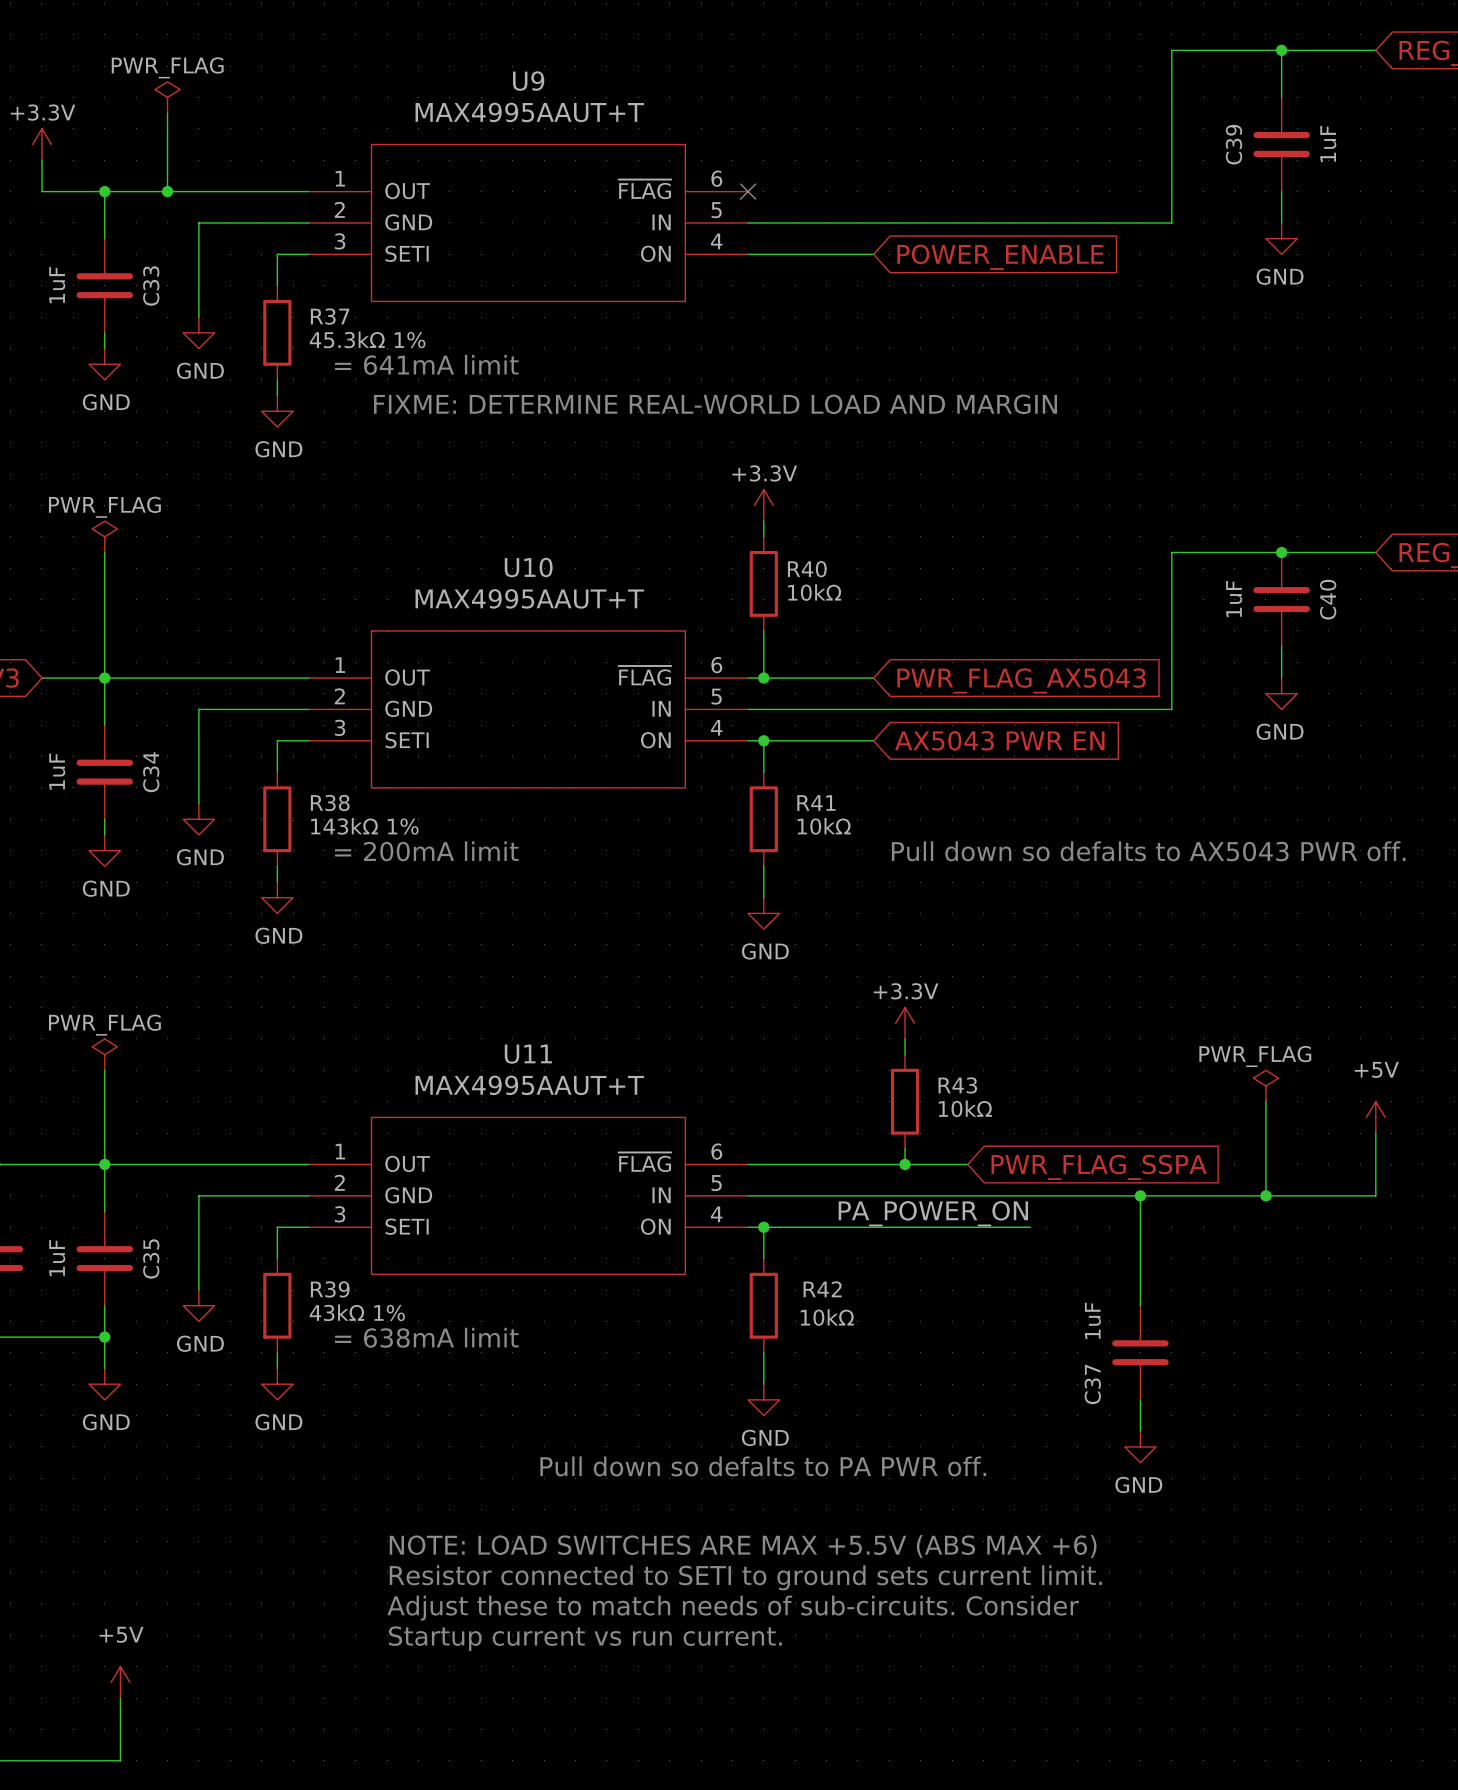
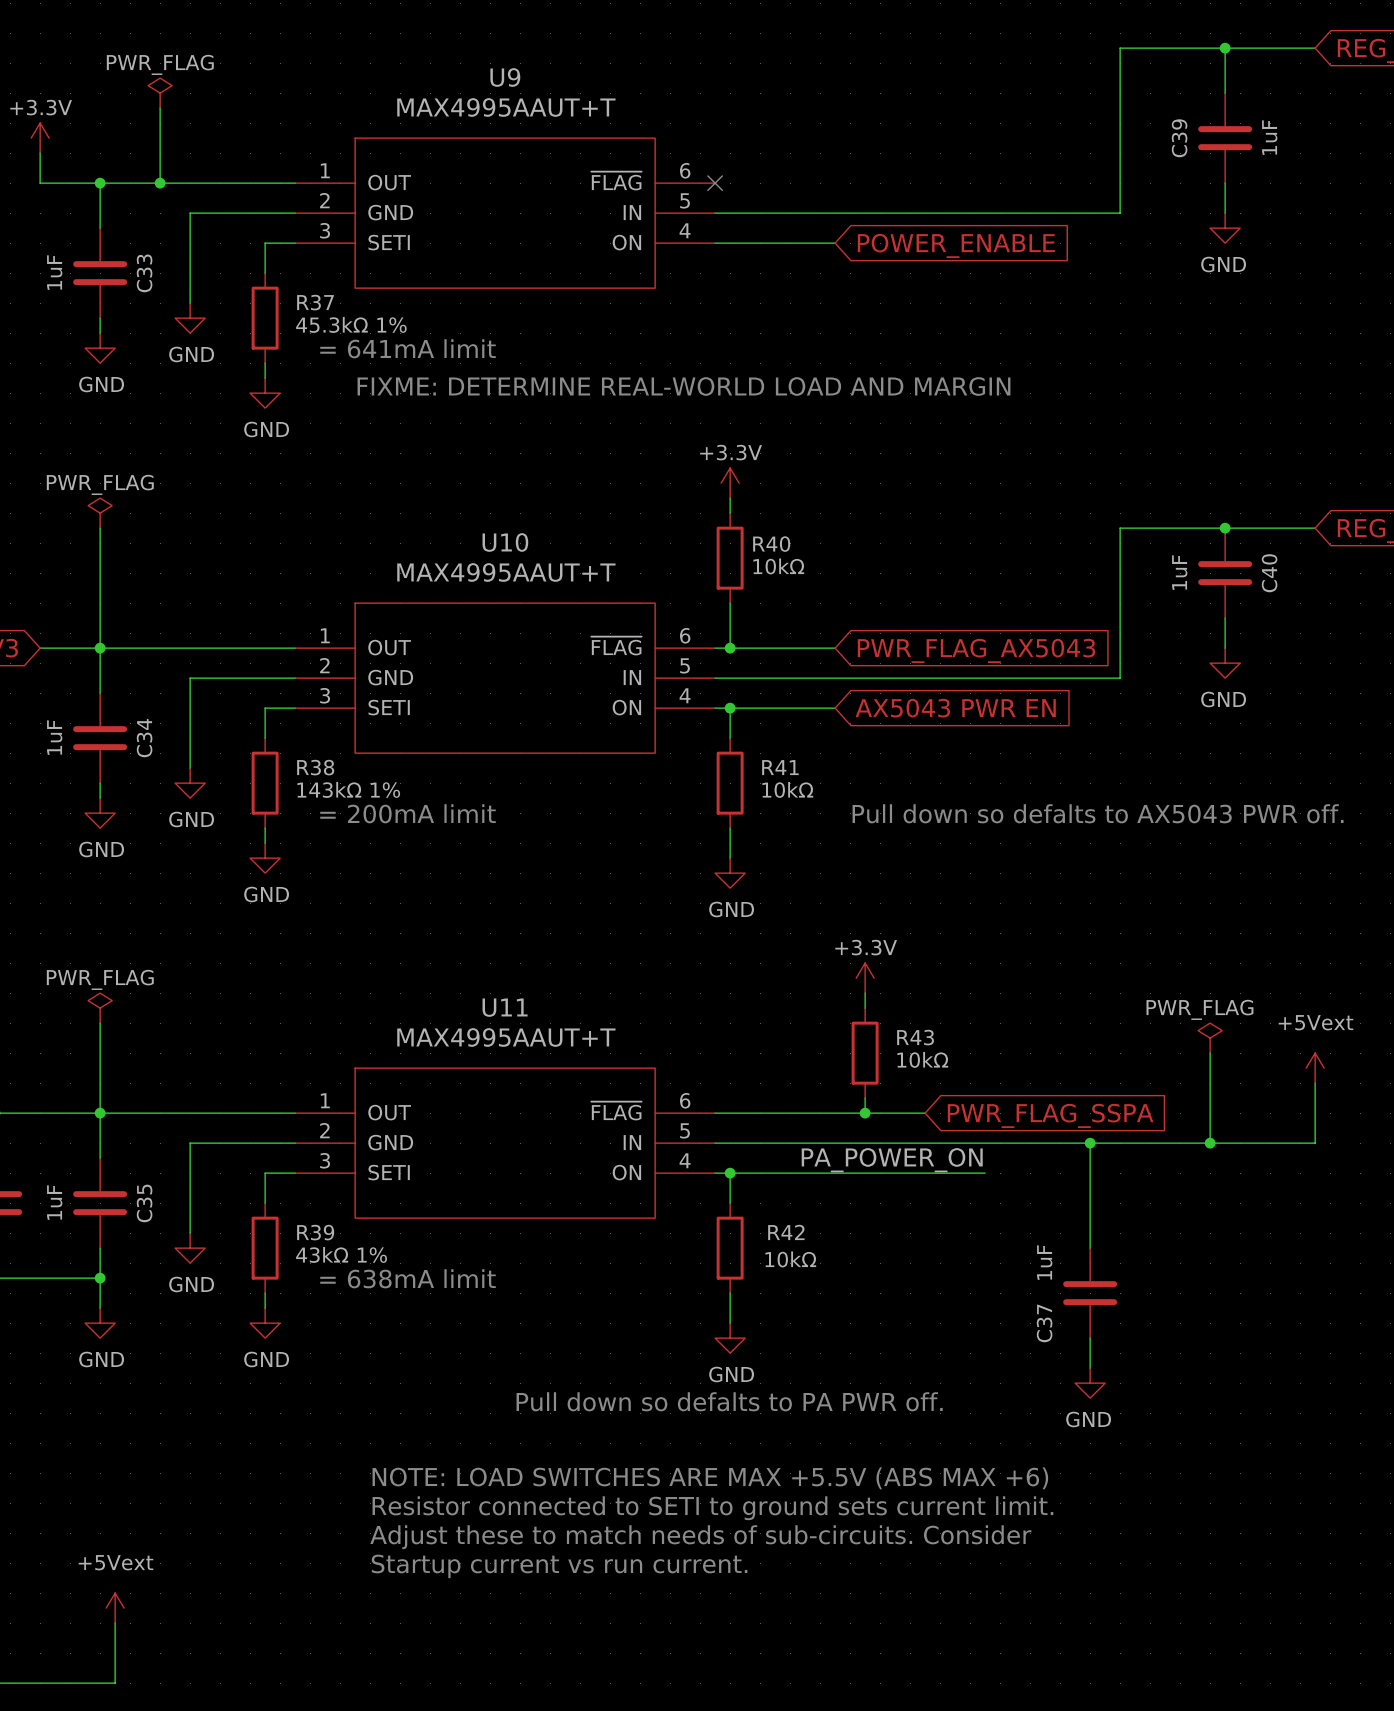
power symbol: +5V (1375, 1117) -> +5Vext (1315, 1068)
power symbol: +5V (120, 1682) -> +5Vext (115, 1608)

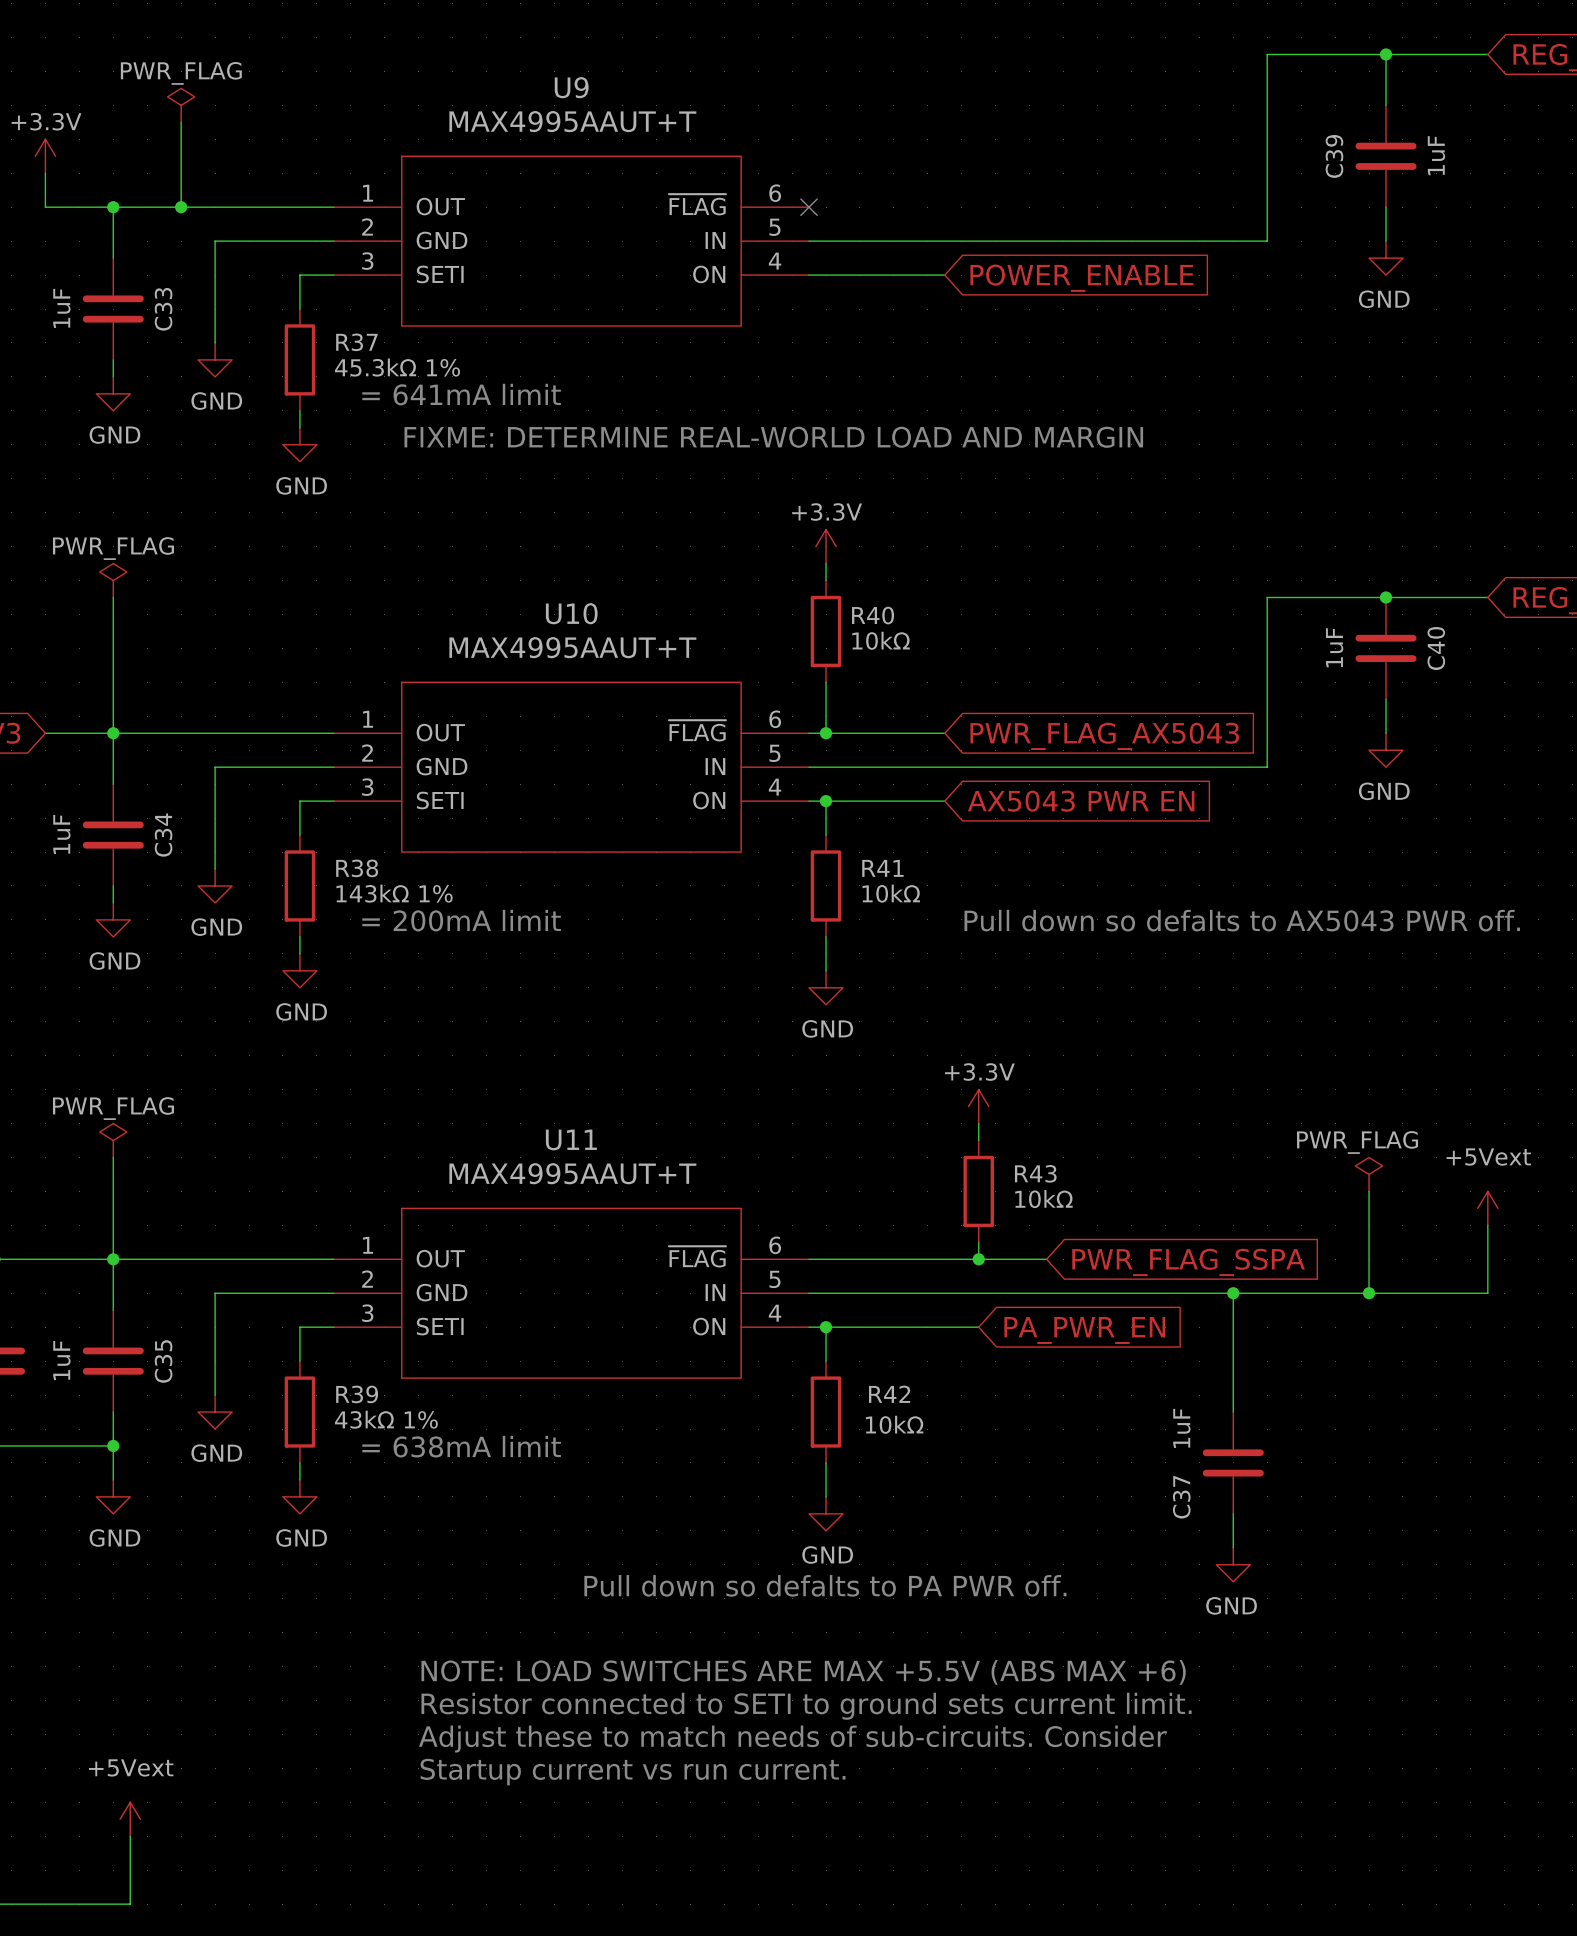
label: PA_POWER_ON (892, 1160) -> none
wire: (865, 1173) (985, 1173) -> none
global label: none -> PA_PWR_EN (1084, 1330)

